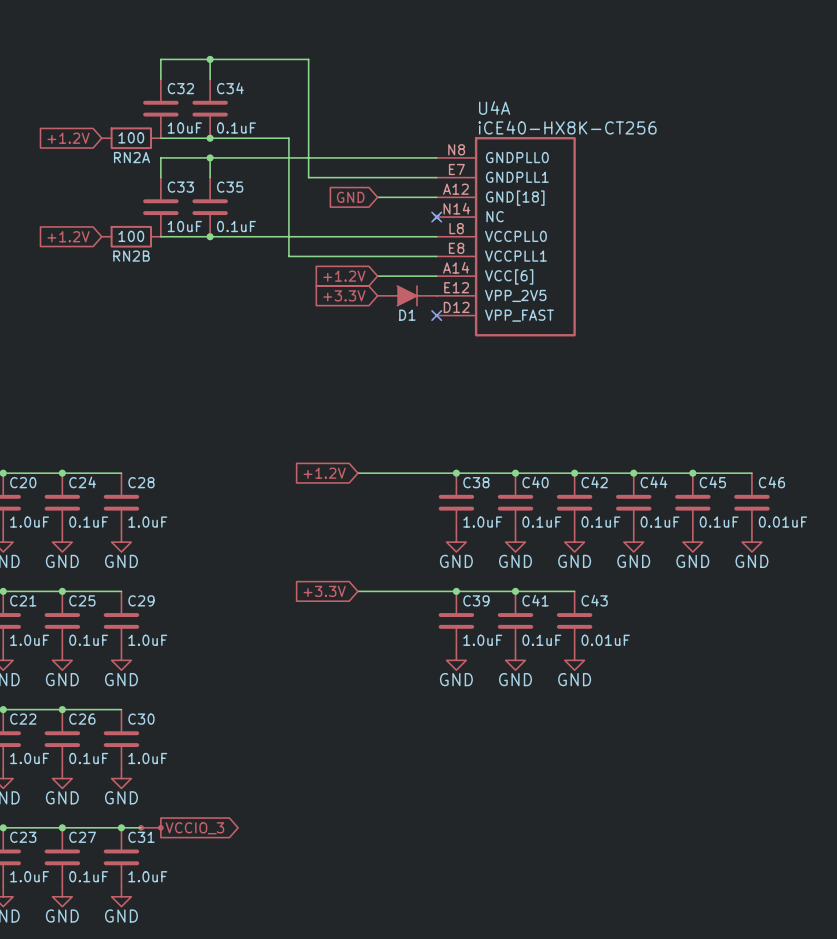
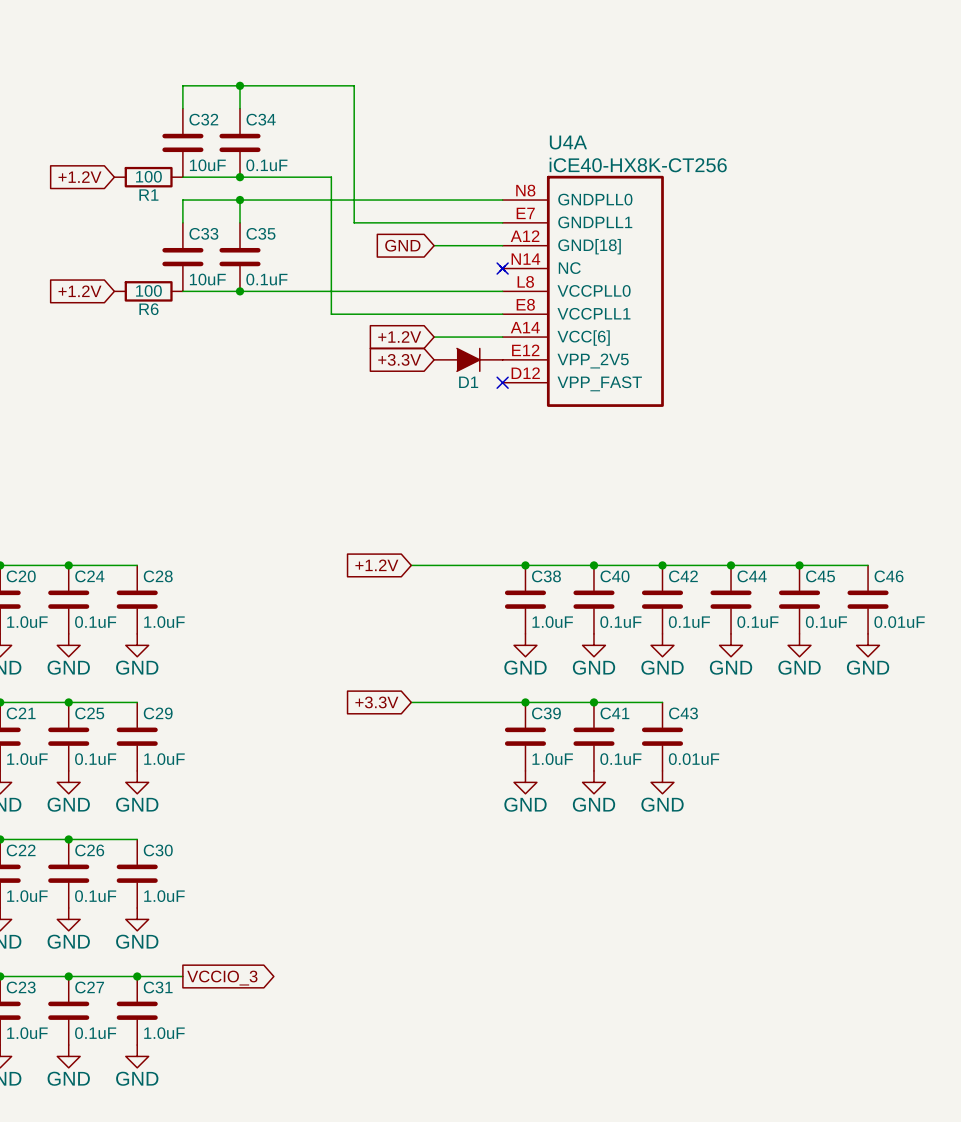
RN2A: 100 (131, 138) -> none
R1: none -> 100 (148, 177)
RN2B: 100 (131, 236) -> none
R6: none -> 100 (148, 291)
part: (151, 827) -> none

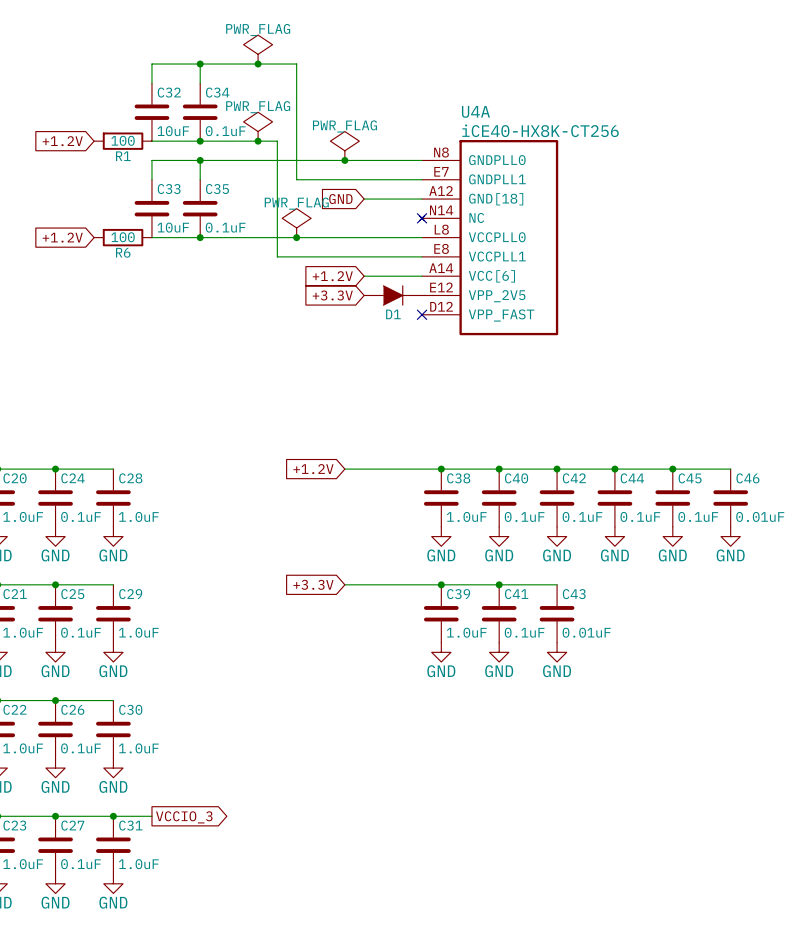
power symbol: none -> PWR_FLAG (258, 49)
junction: none -> (258, 64)
power symbol: none -> PWR_FLAG (258, 126)
junction: none -> (258, 141)
power symbol: none -> PWR_FLAG (344, 145)
junction: none -> (344, 160)
power symbol: none -> PWR_FLAG (296, 223)
junction: none -> (296, 237)

